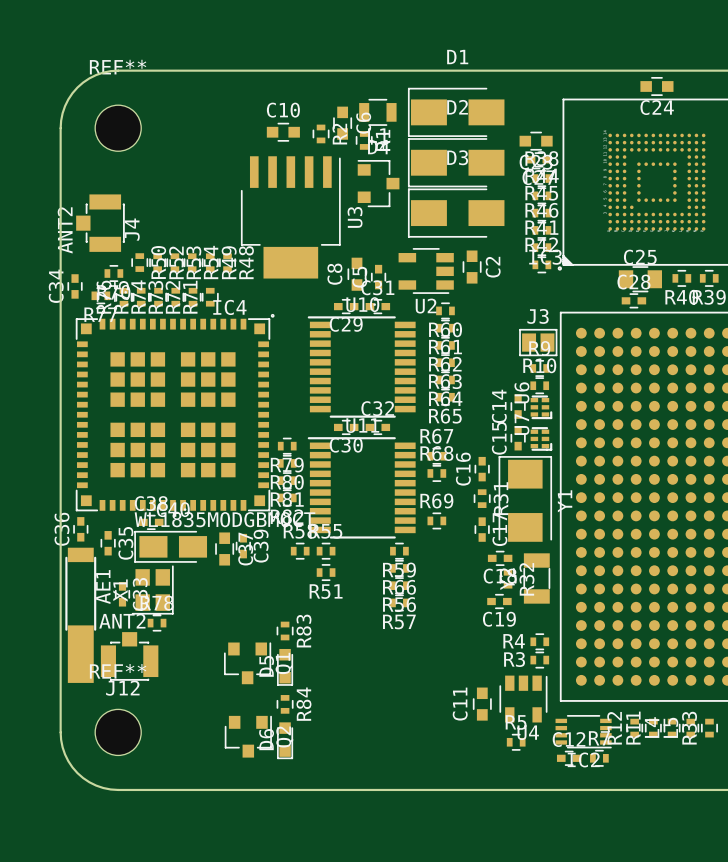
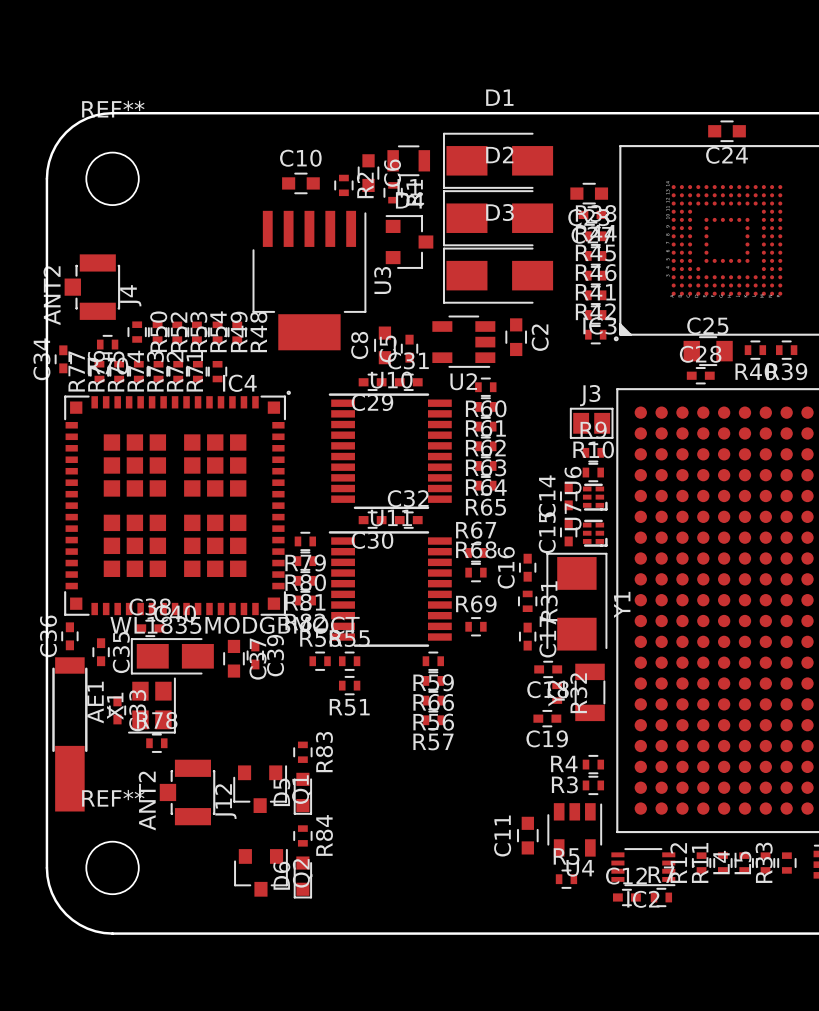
R77 rotation: 0° (100, 295) -> 90° clockwise (99, 371)
J12 rotation: 0° (129, 656) -> 90° counterclockwise (187, 792)
J12 position: (129, 656) -> (187, 792)

